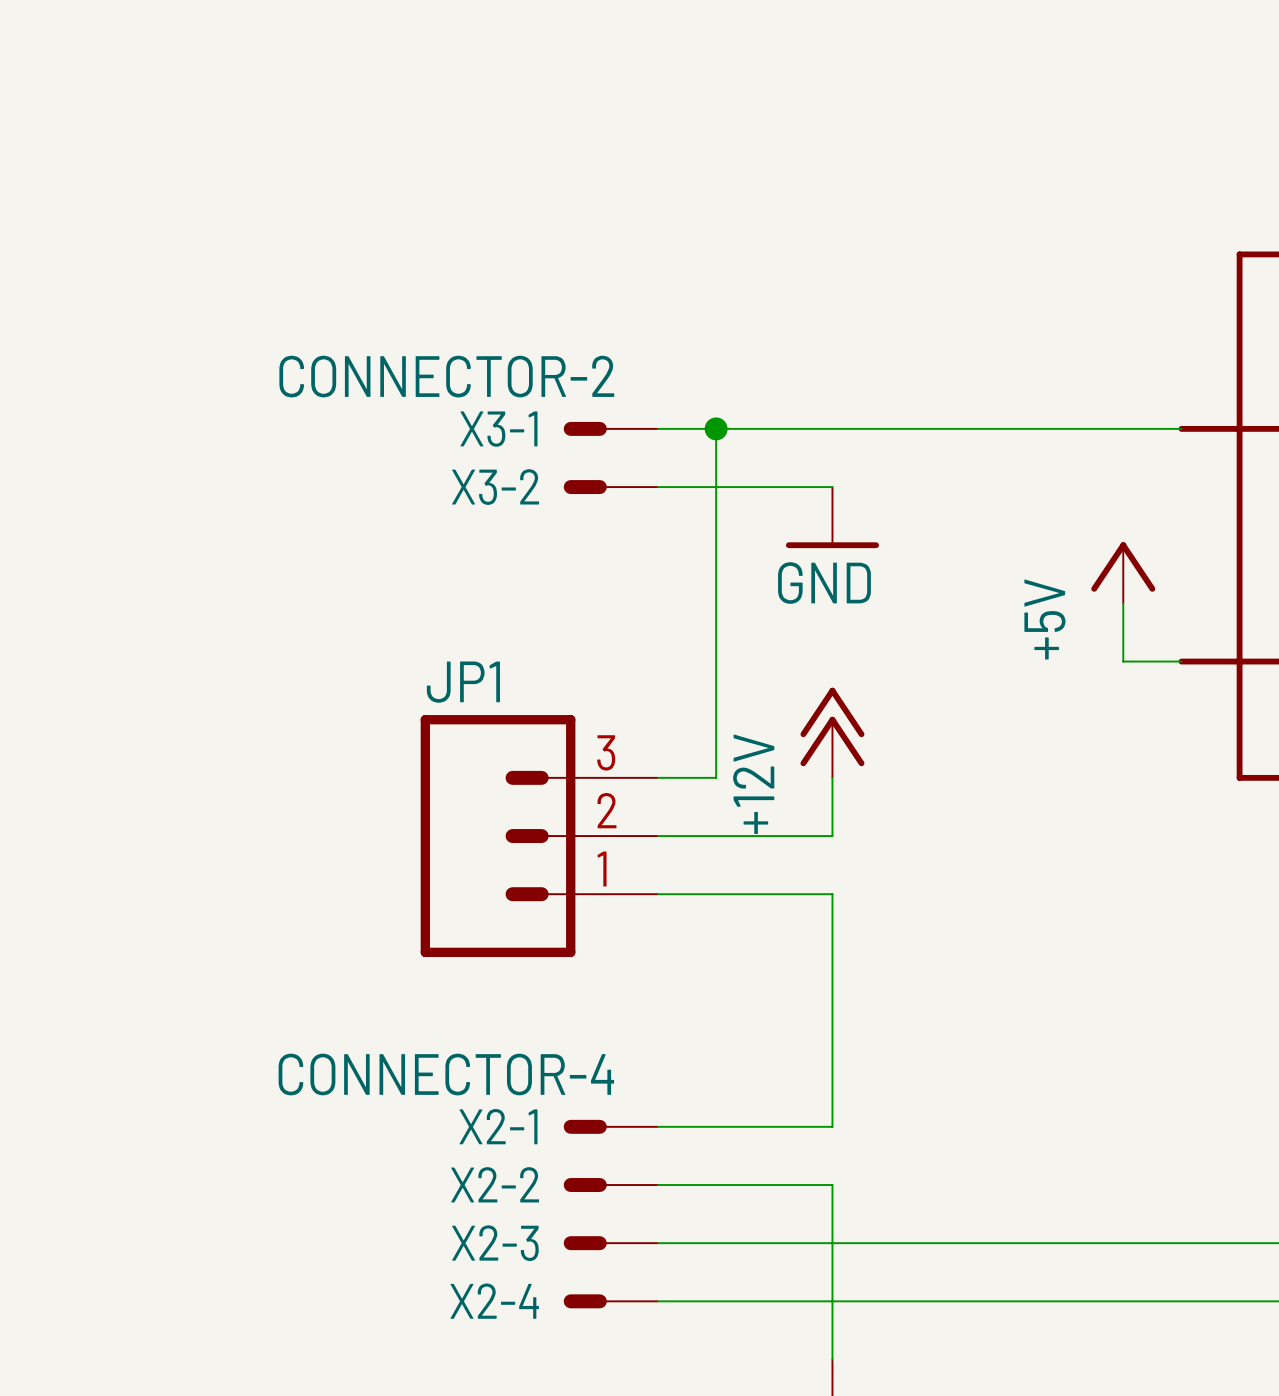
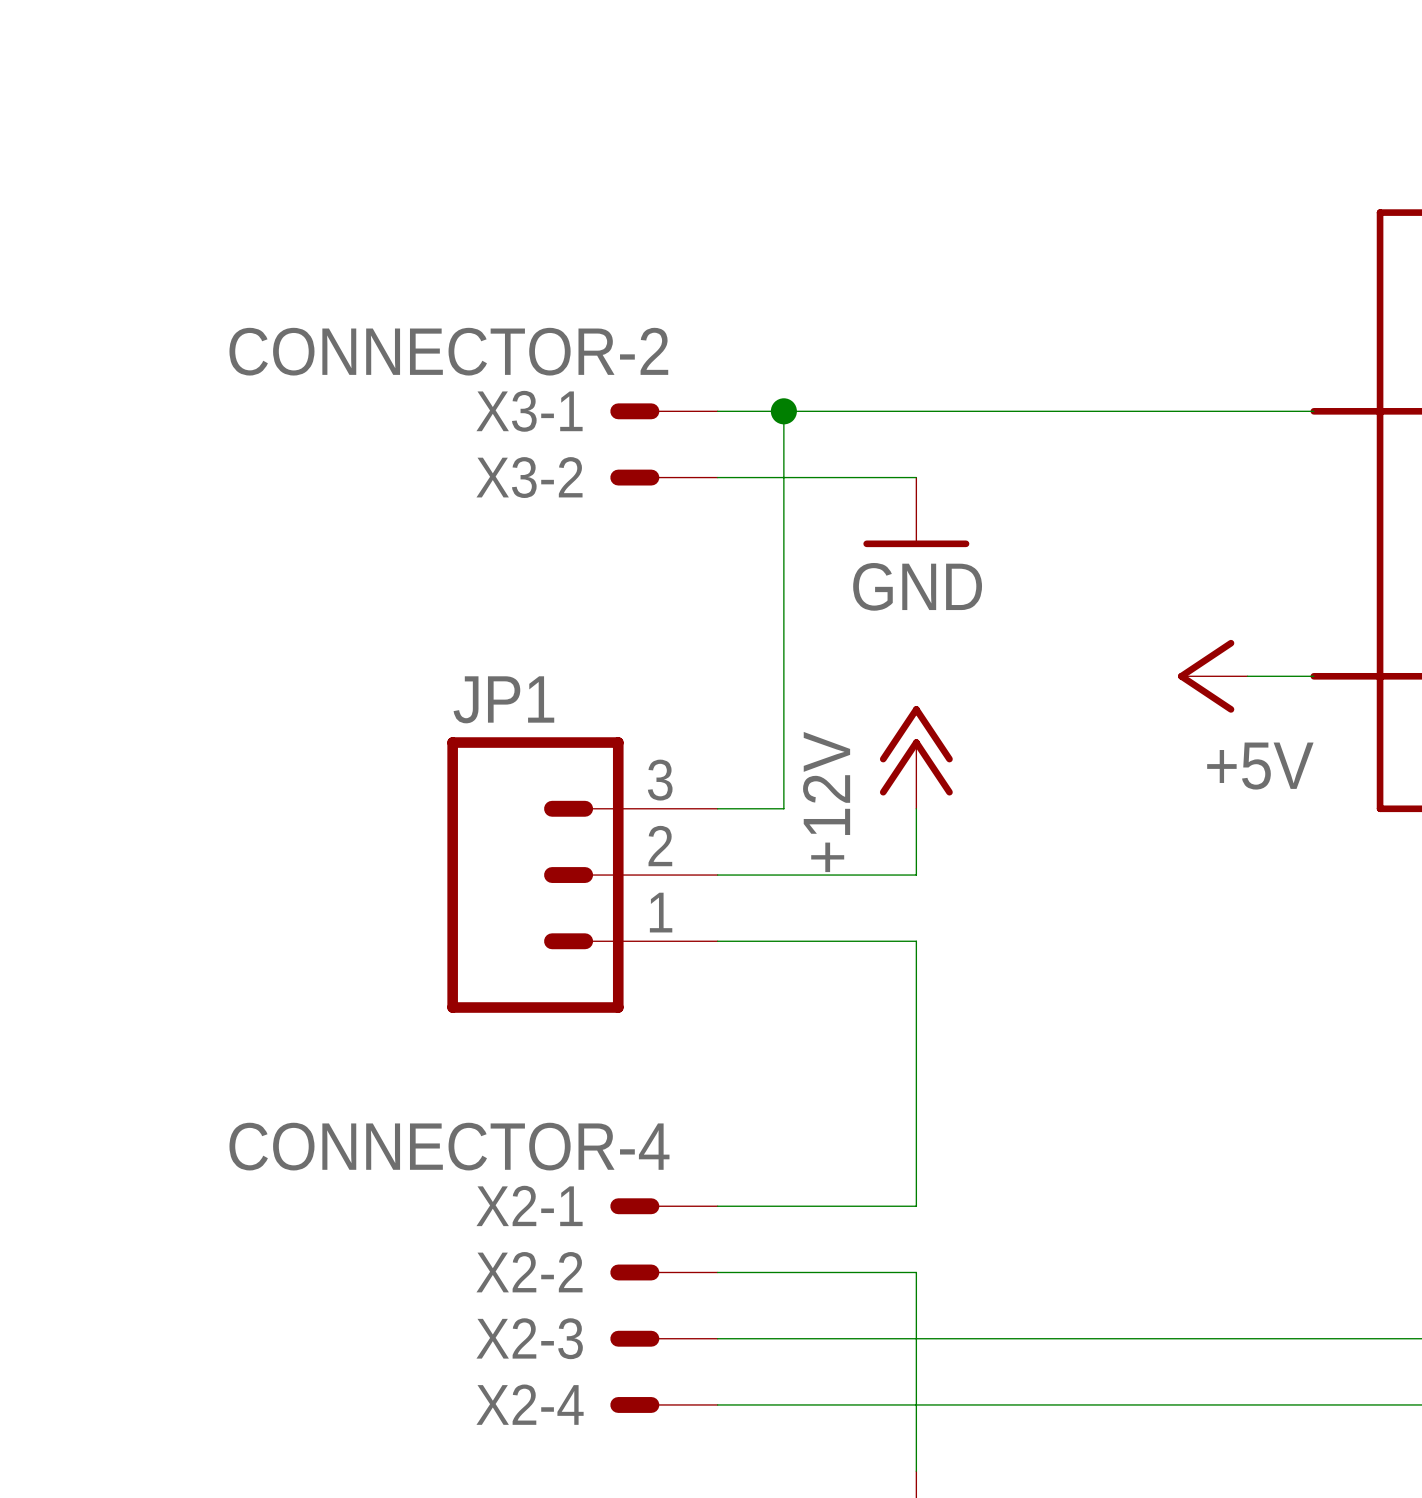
power symbol rotation: 0° (1123, 567) -> 90° counterclockwise (1206, 676)
power symbol position: +5V (1123, 572) -> +5V (1212, 676)
wire: (1123, 603) (1123, 661) -> none

